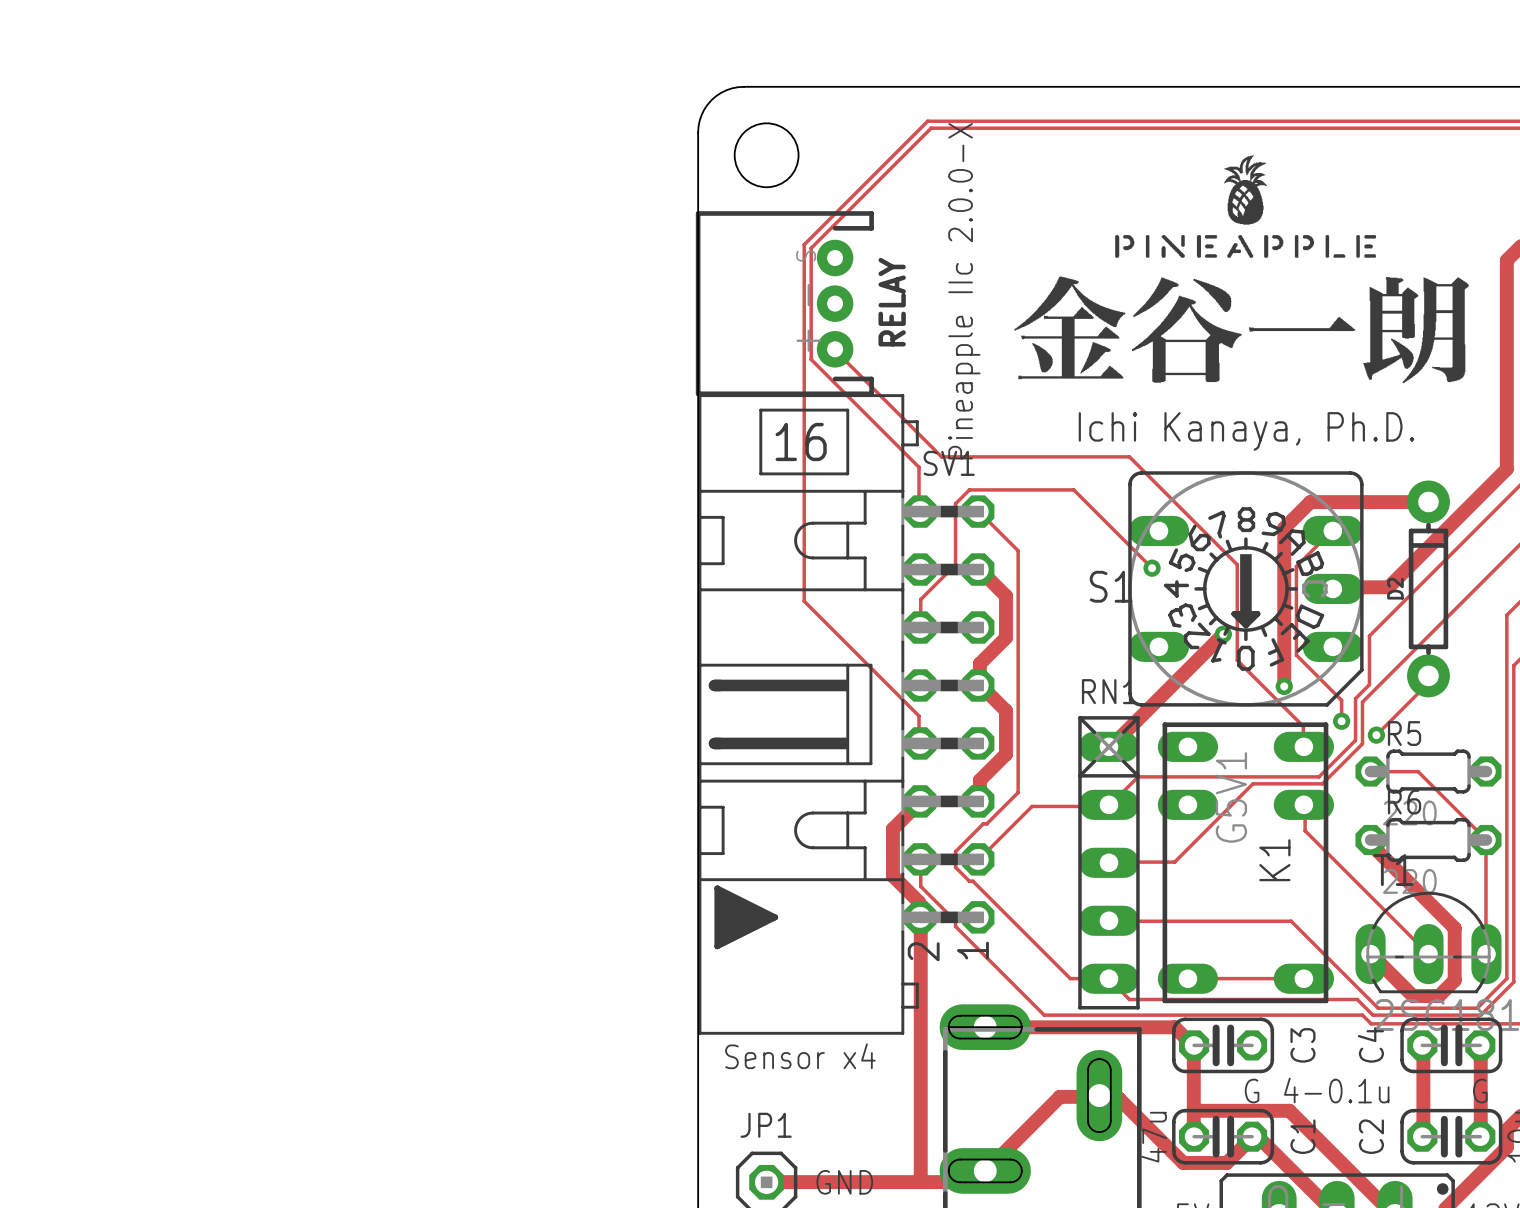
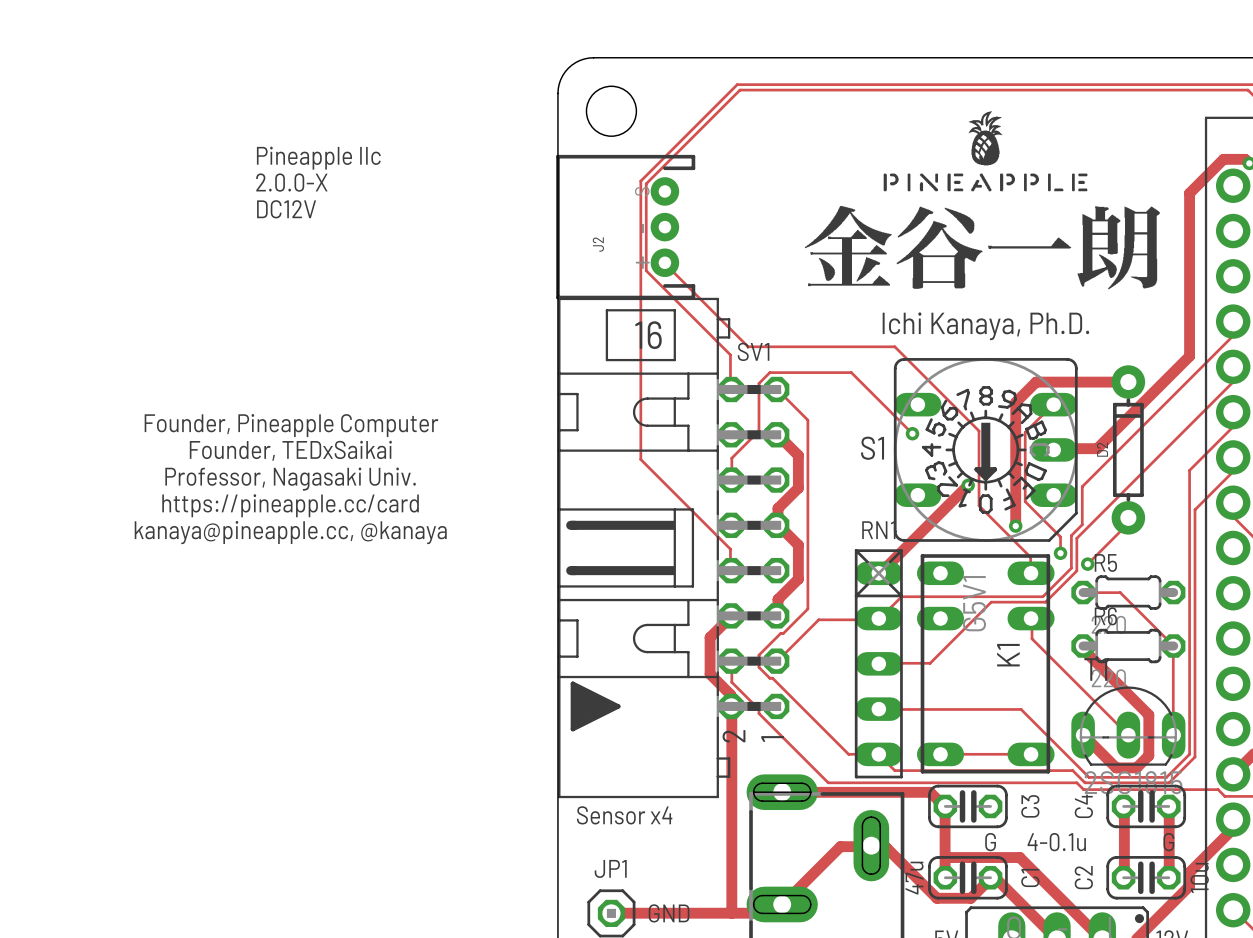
text: none -> Pineapple IIc (318, 158)
text: none -> 2.0.0-X (291, 182)
text: none -> DC12V (286, 209)
text: Pineapple IIc 2.0.0-X (964, 291) -> none
RELAY name: RELAY (892, 302) -> J2 (598, 244)
text: none -> Founder, Pineapple Computer (291, 425)
text: none -> Founder, TEDxSaikai (290, 450)
text: none -> Professor, Nagasaki Univ. (290, 479)
text: none -> https://pineapple.cc/card (290, 505)
text: none -> kanaya@pineapple.cc, @kanaya (290, 532)

